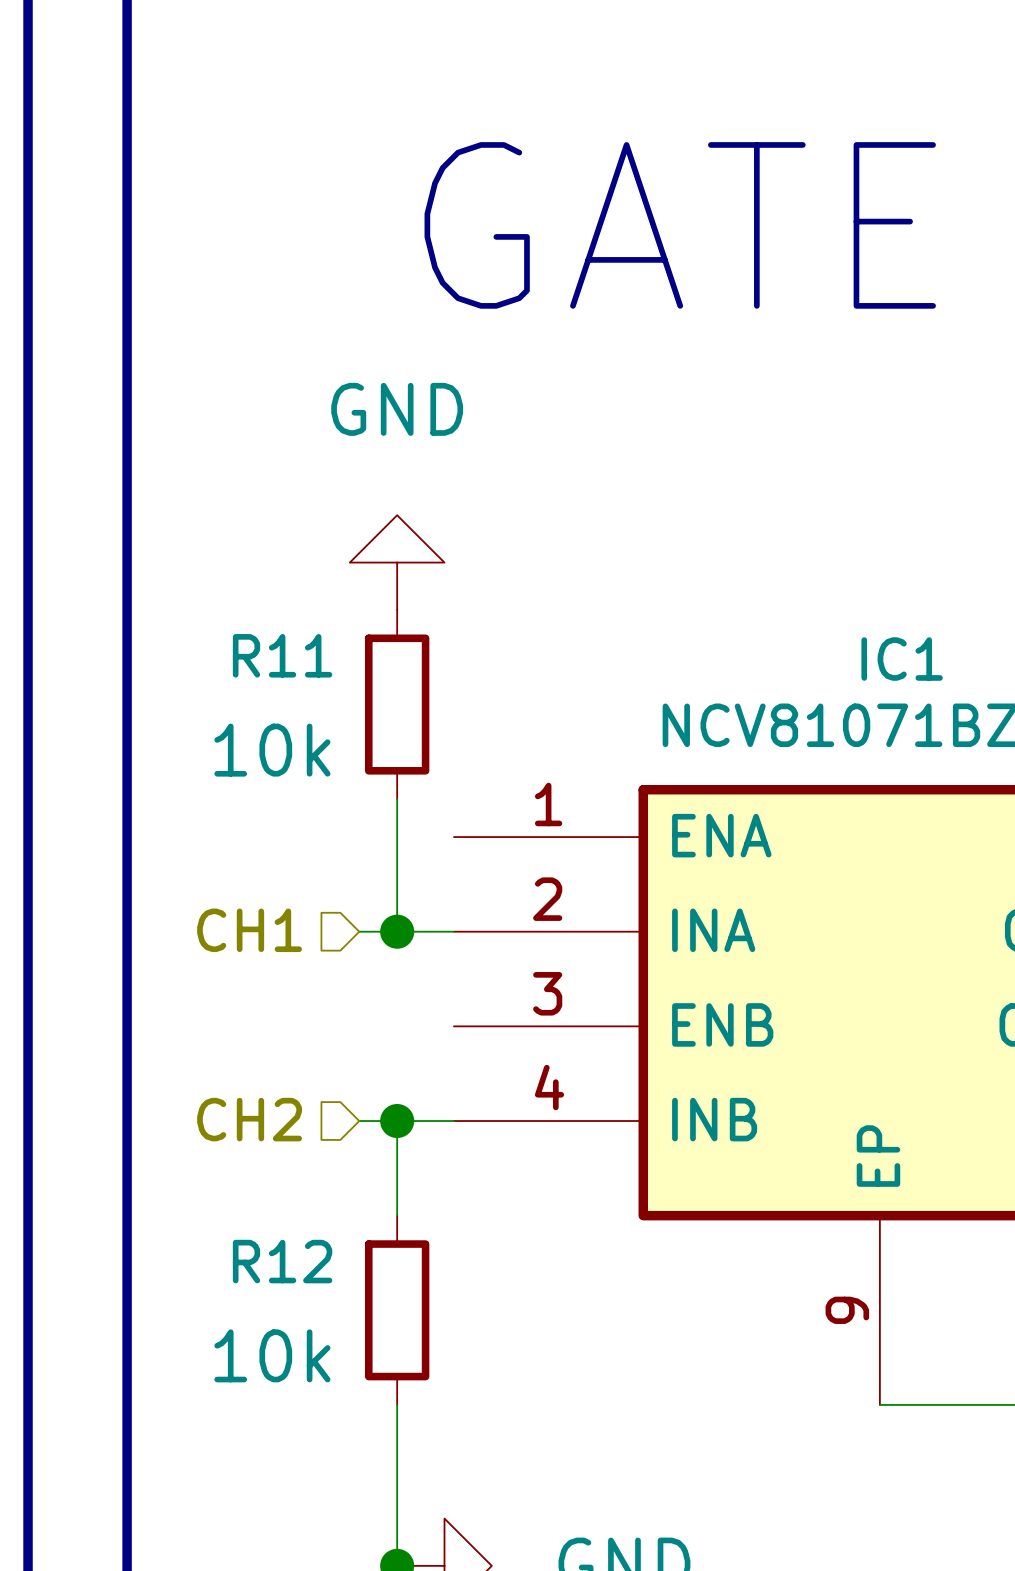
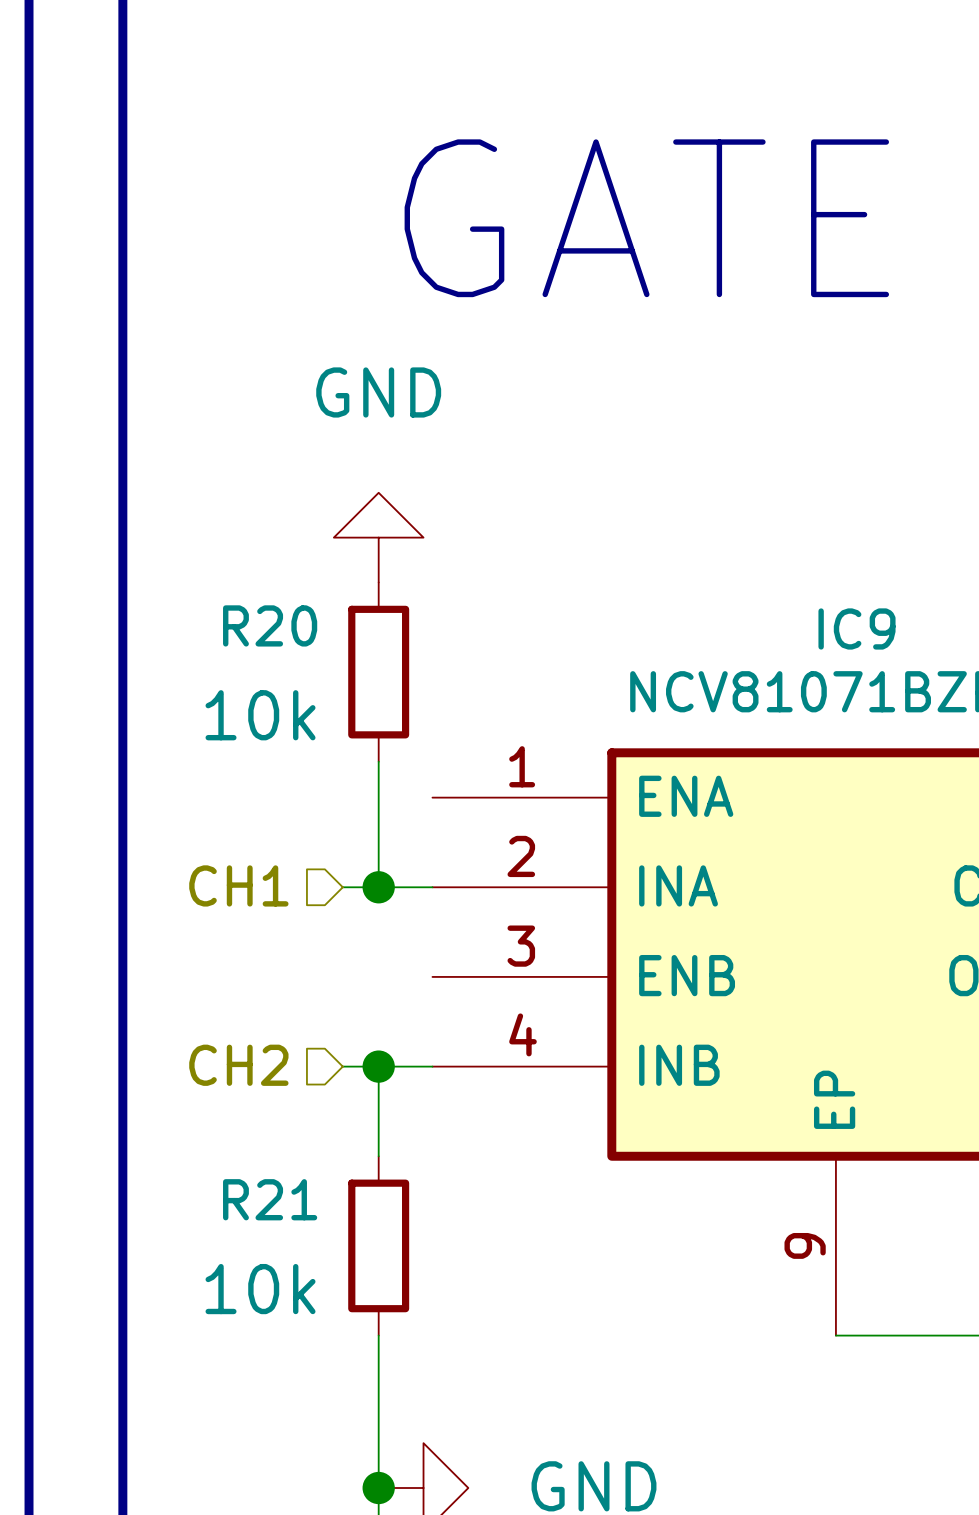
R11 name: R11 (282, 655) -> R20 (270, 625)
IC1 name: IC1 (902, 659) -> IC9 (856, 628)
R12 name: R12 (282, 1261) -> R21 (270, 1199)

